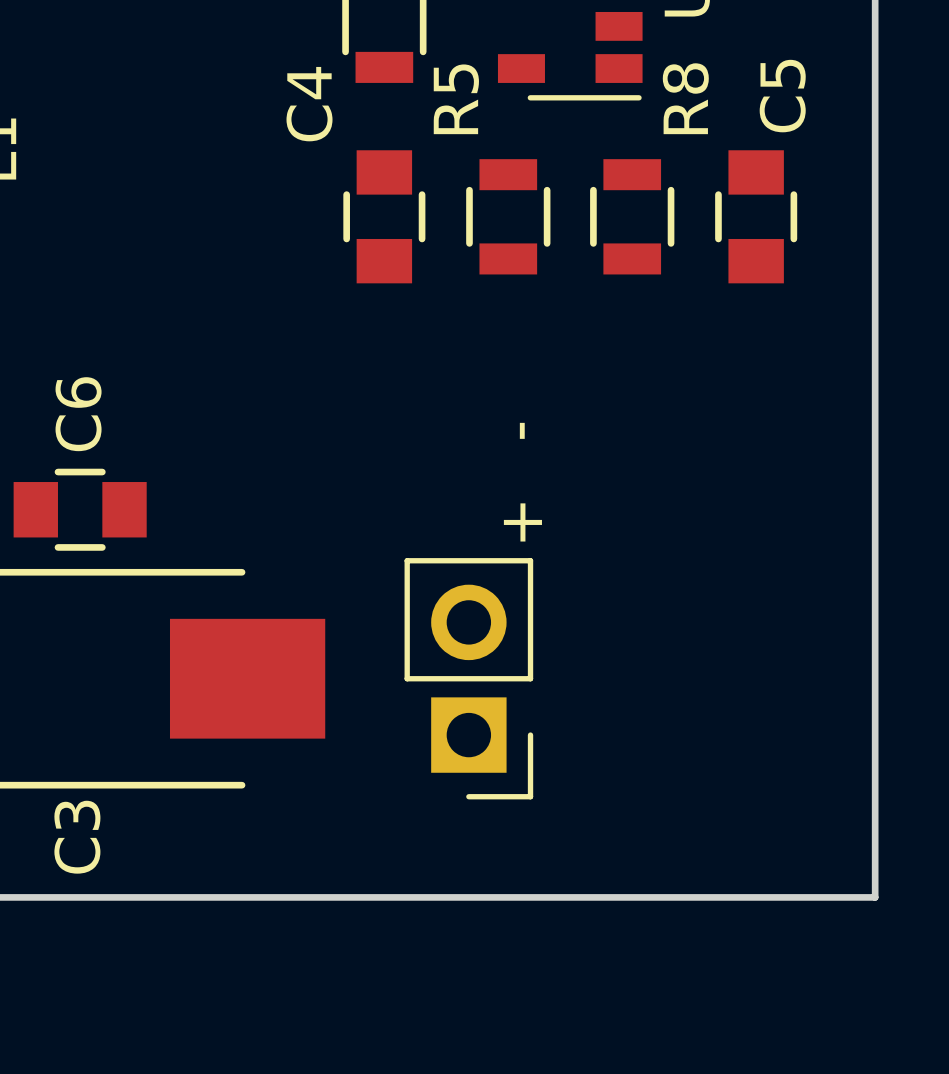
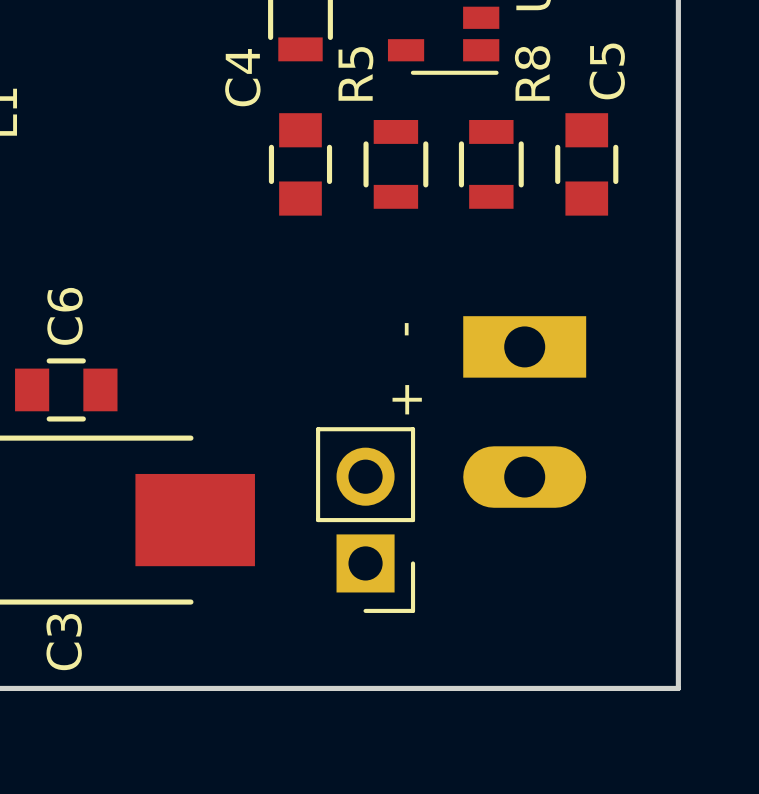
part: none -> (524, 411)

